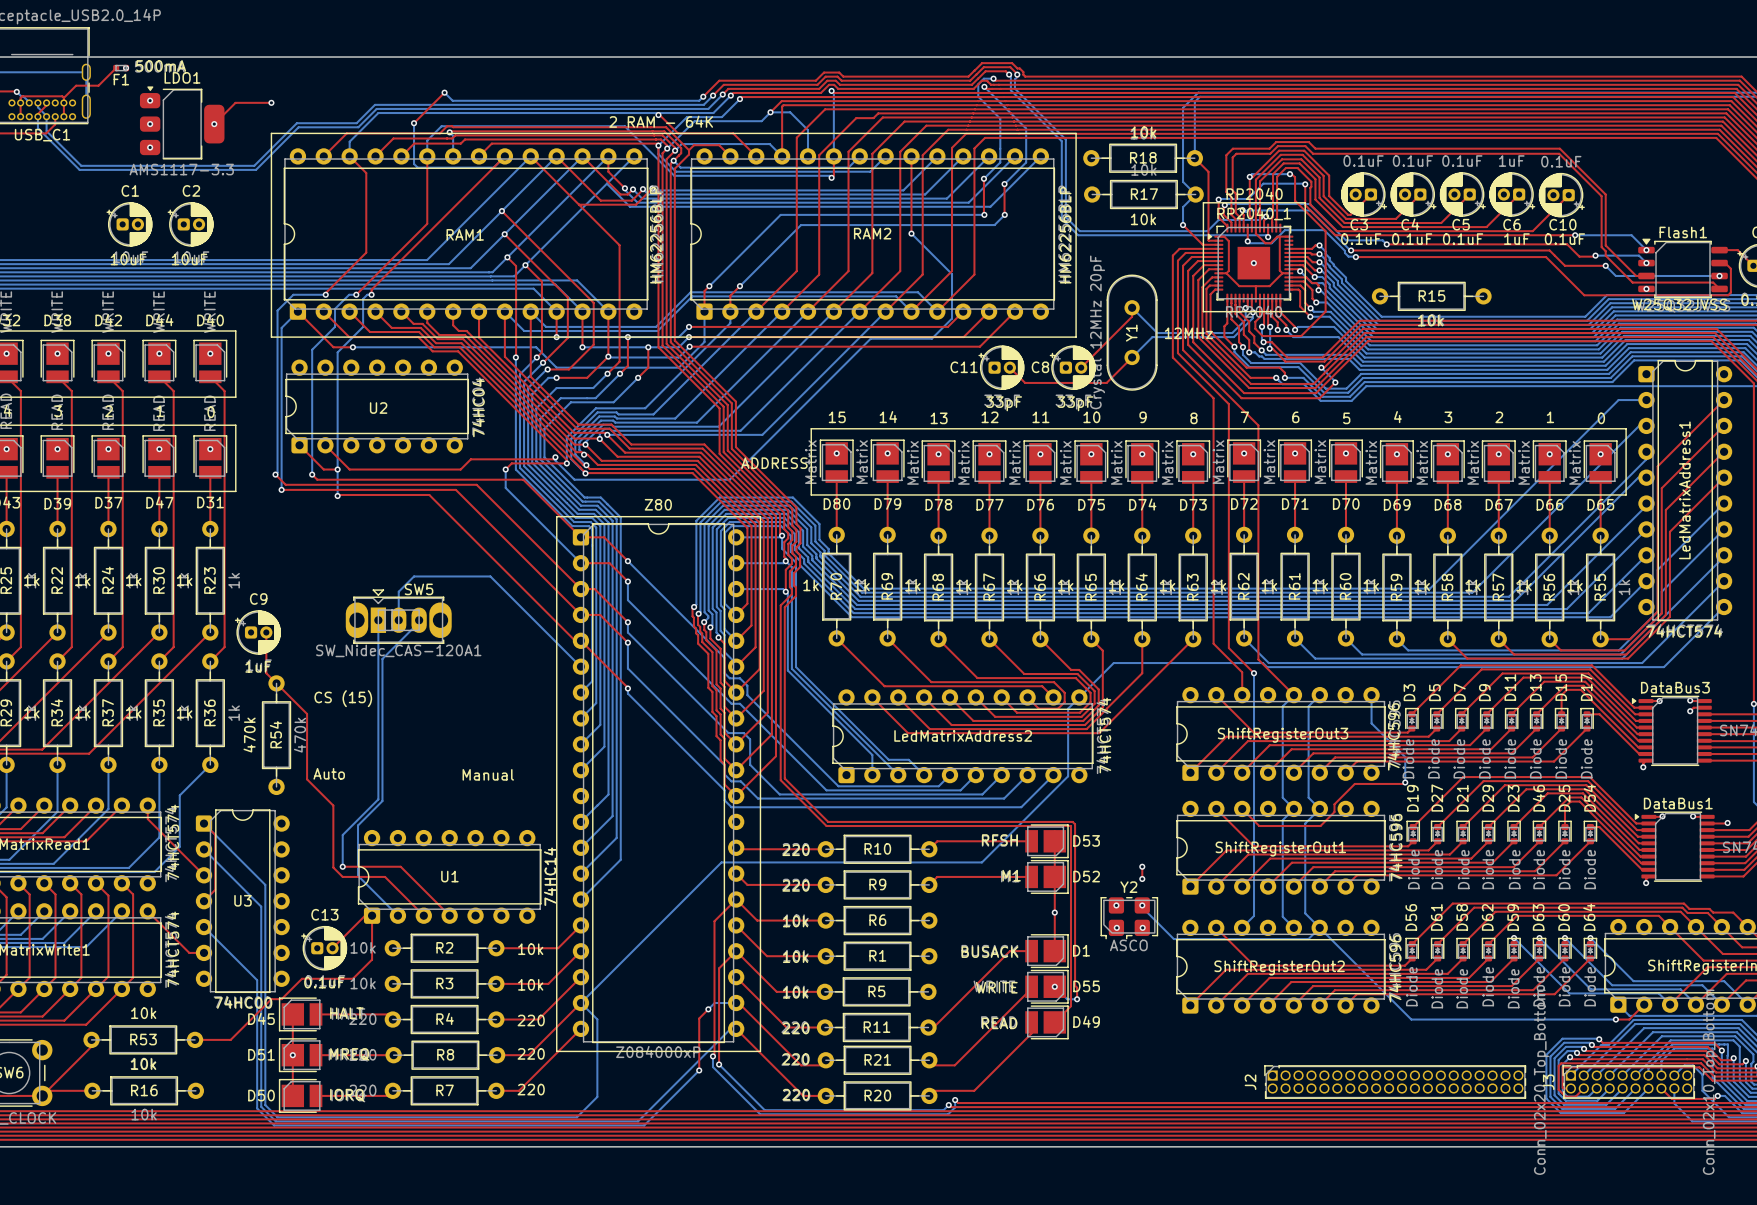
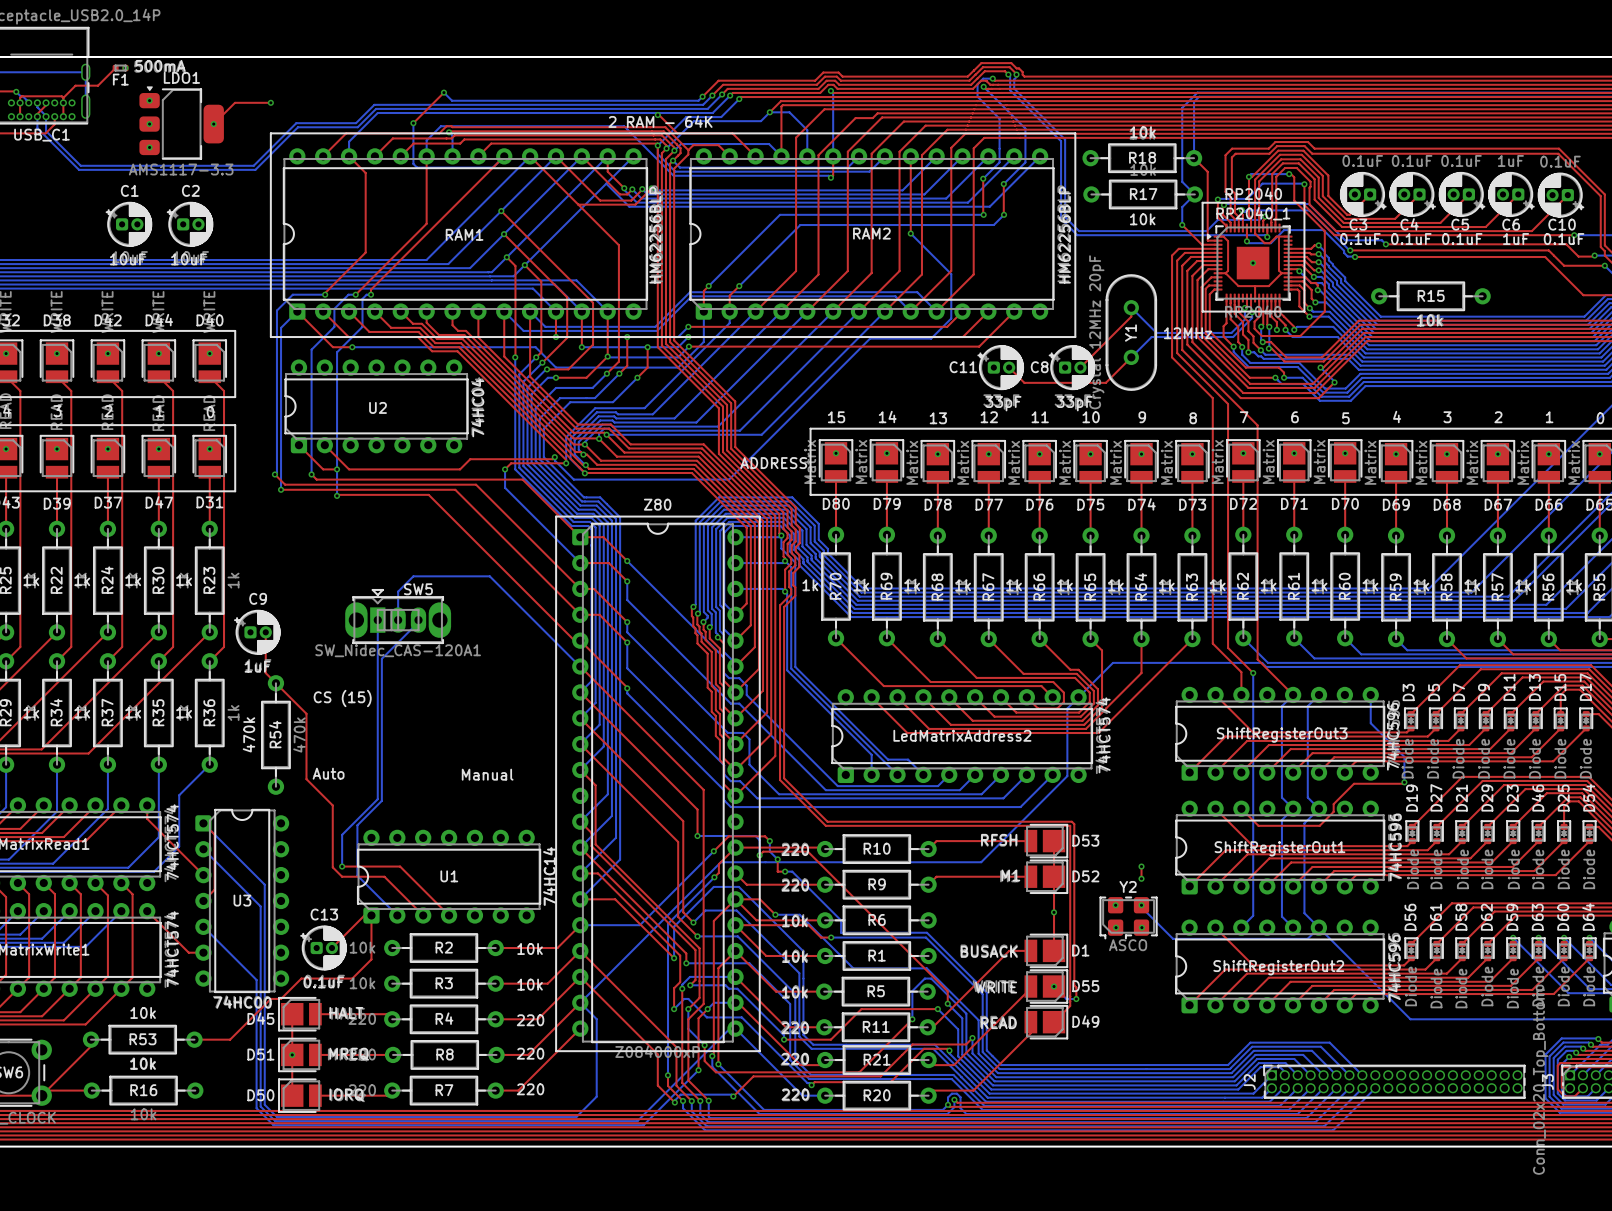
top track: none -> (580, 666) (703, 789) (703, 1004) (688, 1019) (688, 1080) (708, 1100)
top track: none -> (580, 692) (697, 809) (697, 836)
top track: none -> (580, 718) (683, 821) (683, 912) (693, 922)
top track: none -> (580, 744) (678, 841) (678, 917) (697, 936)
top track: none -> (580, 769) (595, 785) (595, 844) (699, 948) (699, 997) (688, 1009)
top track: none -> (580, 821) (591, 832) (591, 846) (695, 950) (695, 980) (690, 985)
bottom track: none -> (697, 836) (755, 836) (759, 840) (759, 855)
via: none -> (697, 836)
top track: none -> (769, 841) (765, 836) (728, 836) (713, 851)
bottom track: none -> (769, 841) (769, 851) (777, 859)
via: none -> (769, 841)
top track: none -> (580, 847) (686, 953) (686, 963)
top track: (736, 847) (825, 849) -> (714, 877) (718, 872) (718, 864) (735, 847) (825, 849)
bottom track: none -> (713, 851) (639, 925) (580, 925)
via: none -> (713, 851)
top track: none -> (759, 855) (763, 851) (807, 851) (947, 991) (947, 1003)
via: none -> (759, 855)
top track: none -> (777, 859) (777, 871) (785, 871)
via: none -> (777, 859)
bottom track: none -> (785, 871) (792, 871) (841, 920) (841, 932) (926, 932) (986, 992) (986, 1050) (1001, 1065) (1228, 1065) (1250, 1042) (1329, 1042) (1362, 1075)
via: none -> (785, 871)
top track: none -> (580, 873) (598, 873) (680, 955) (680, 982) (674, 988) (674, 1009)
bottom track: none -> (714, 877) (667, 923) (667, 1075)
via: none -> (714, 877)
top track: none -> (580, 899) (615, 899) (674, 958)
top track: none -> (735, 899) (760, 899) (775, 914)
bottom track: none -> (775, 914) (799, 914) (853, 968) (926, 968) (978, 1020) (978, 1053) (998, 1073) (1231, 1073) (1253, 1050) (1312, 1050) (1336, 1075)
via: none -> (775, 914)
bottom track: none -> (693, 922) (705, 910) (736, 910) (799, 973) (799, 1036) (811, 1048) (933, 1048) (961, 1077)
via: none -> (693, 922)
top track: none -> (735, 925) (808, 925) (821, 937) (831, 937)
bottom track: none -> (697, 936) (737, 936) (795, 993) (795, 1059) (810, 1074) (953, 1074) (984, 1105) (1280, 1105) (1297, 1088)
via: none -> (697, 936)
bottom track: none -> (831, 937) (926, 937) (982, 994) (982, 1052) (999, 1069) (1229, 1069) (1252, 1046) (1320, 1046) (1349, 1075)
via: none -> (831, 937)
top track: none -> (580, 951) (676, 1047) (676, 1085) (691, 1101)
bottom track: none -> (674, 958) (674, 926) (713, 886) (738, 886) (803, 951) (803, 1034) (813, 1044) (934, 1044) (971, 1081)
via: none -> (674, 958)
bottom track: none -> (686, 963) (749, 963) (790, 1004) (790, 1060) (809, 1079) (951, 1079) (982, 1109) (1288, 1109) (1310, 1088)
via: none -> (686, 963)
top track: none -> (580, 976) (657, 1054) (657, 1085) (674, 1102)
bottom track: none -> (735, 976) (690, 976) (682, 984) (682, 988)
bottom track: none -> (690, 985) (725, 985) (729, 988) (737, 988) (784, 1035) (784, 1039)
via: none -> (690, 985)
top track: none -> (682, 988) (682, 1082) (700, 1101)
via: none -> (682, 988)
bottom track: none -> (947, 1003) (962, 1018) (962, 1054) (992, 1085) (1236, 1085) (1258, 1063) (1285, 1063) (1297, 1075)
via: none -> (947, 1003)
bottom track: none -> (674, 1009) (684, 998) (688, 998) (706, 1017) (741, 1017) (811, 1085)
via: none -> (674, 1009)
bottom track: none -> (688, 1009) (688, 1028) (704, 1045)
via: none -> (688, 1009)
top track: none -> (937, 1009) (861, 1009) (830, 1039) (784, 1039)
bottom track: none -> (937, 1009) (958, 1029) (958, 1056) (991, 1089) (1238, 1089) (1260, 1067) (1280, 1067) (1284, 1071) (1284, 1075)
via: none -> (937, 1009)
top track: none -> (912, 1019) (859, 1072) (715, 1072) (704, 1061) (704, 1045)
bottom track: none -> (912, 1019) (912, 991) (924, 978) (931, 978) (966, 1013) (966, 1053) (994, 1081) (1234, 1081) (1257, 1058) (1294, 1058) (1310, 1075)
via: none -> (912, 1019)
top track: (736, 1028) (803, 1095) (825, 1095) -> none
bottom track: none -> (735, 1028) (802, 1095) (825, 1095)
top track: none -> (972, 1038) (966, 1044) (912, 1044) (880, 1076) (753, 1076) (733, 1096)
bottom track: none -> (972, 1038) (972, 1053) (996, 1077) (1233, 1077) (1255, 1054) (1303, 1054) (1323, 1075)
via: none -> (972, 1038)
via: none -> (784, 1039)
via: none -> (704, 1045)
top track: none -> (949, 1050) (947, 1048) (923, 1048) (890, 1082) (814, 1082) (811, 1085)
bottom track: none -> (949, 1050) (949, 1053) (989, 1093) (1253, 1093) (1271, 1075)
via: none -> (949, 1050)
top track: none -> (667, 1075) (667, 1085) (683, 1100)
via: none -> (667, 1075)
bottom track: none -> (961, 1077) (986, 1101) (1269, 1101) (1284, 1088)
bottom track: none -> (971, 1081) (987, 1097) (1262, 1097) (1271, 1088)
via: none -> (811, 1085)
bottom track: none -> (1323, 1088) (1297, 1114) (966, 1114) (960, 1108) (960, 1097) (956, 1093) (951, 1093) (948, 1097) (948, 1104)
bottom track: none -> (1336, 1088) (1306, 1118) (710, 1118) (708, 1100)
bottom track: none -> (1349, 1088) (1315, 1122) (708, 1122) (700, 1114) (700, 1101)
bottom track: none -> (1362, 1088) (1324, 1126) (706, 1126) (691, 1111) (691, 1101)
bottom track: none -> (1375, 1088) (1333, 1130) (705, 1130) (683, 1108) (683, 1100)
bottom track: none -> (733, 1096) (731, 1094) (680, 1094) (674, 1102)
via: none -> (733, 1096)
via: none -> (683, 1100)
via: none -> (691, 1101)
via: none -> (700, 1101)
via: none -> (708, 1100)
via: none -> (674, 1102)

